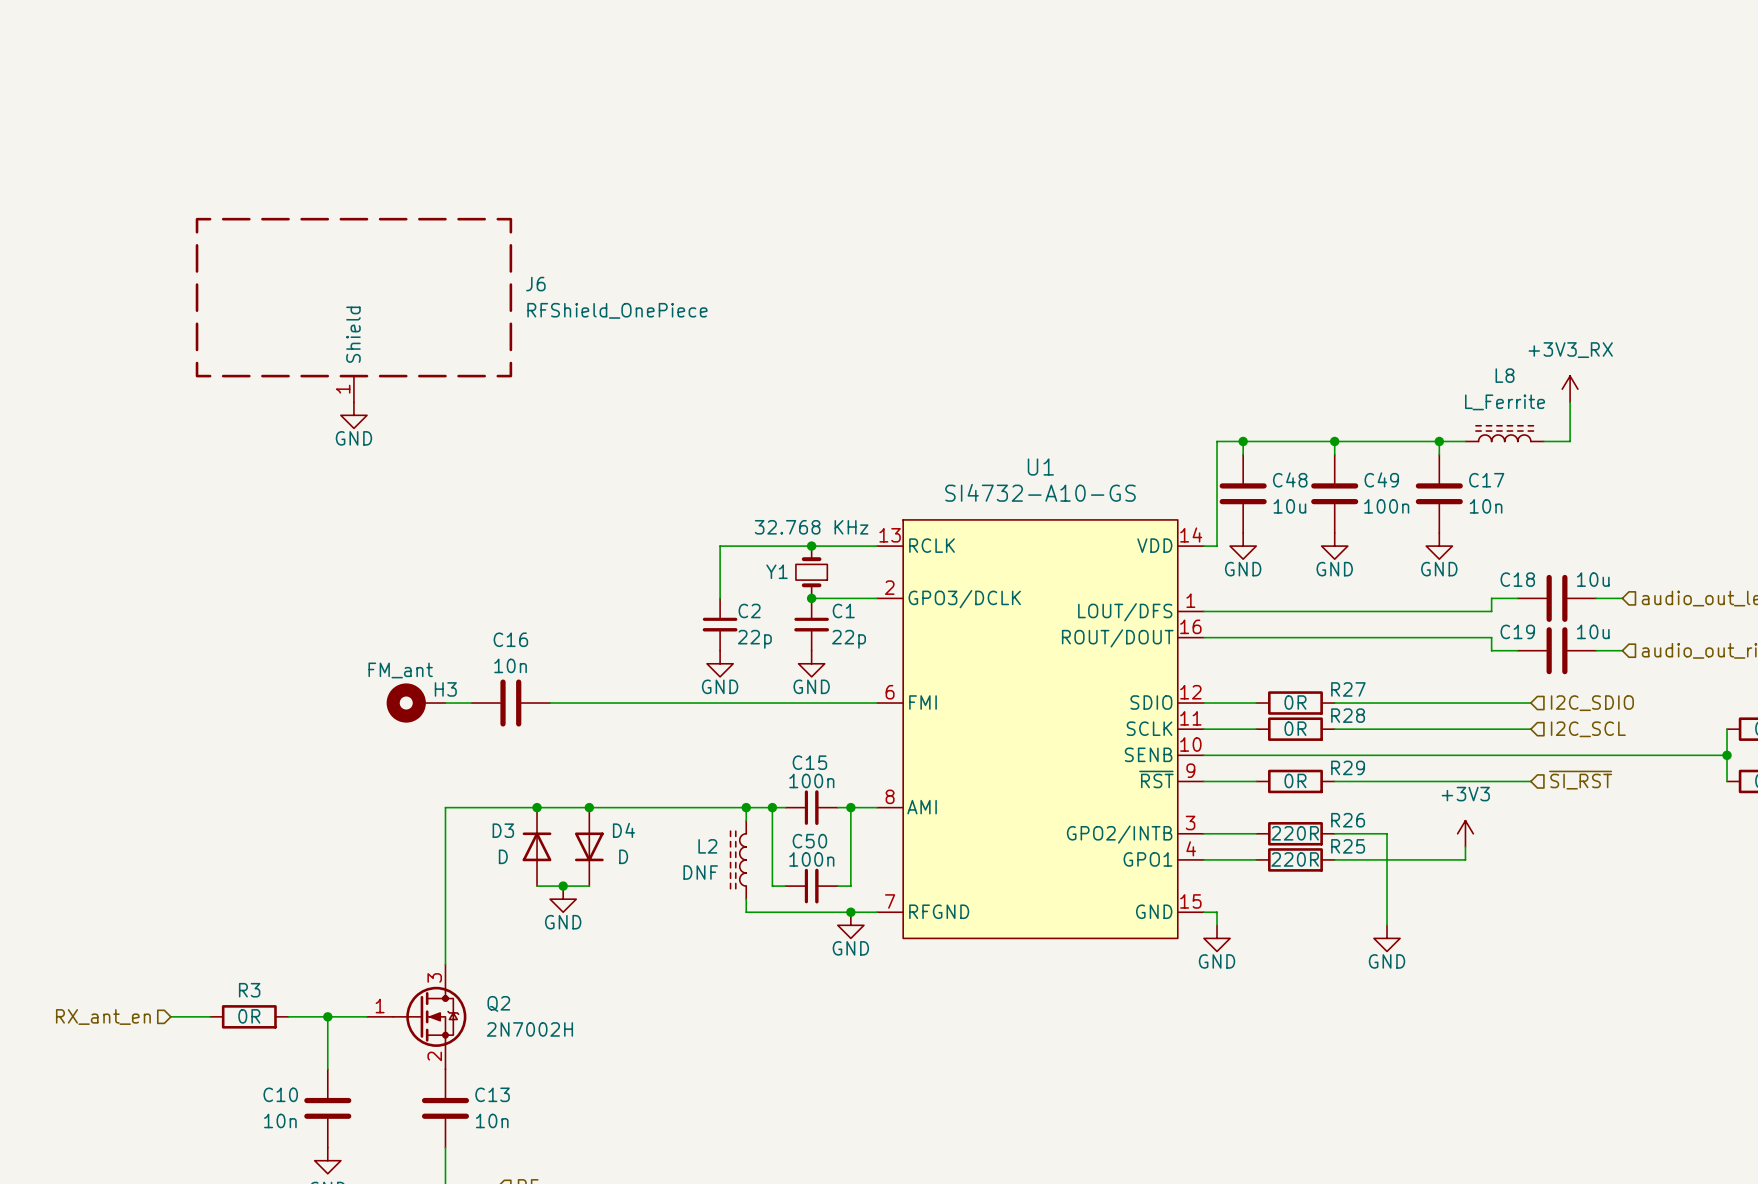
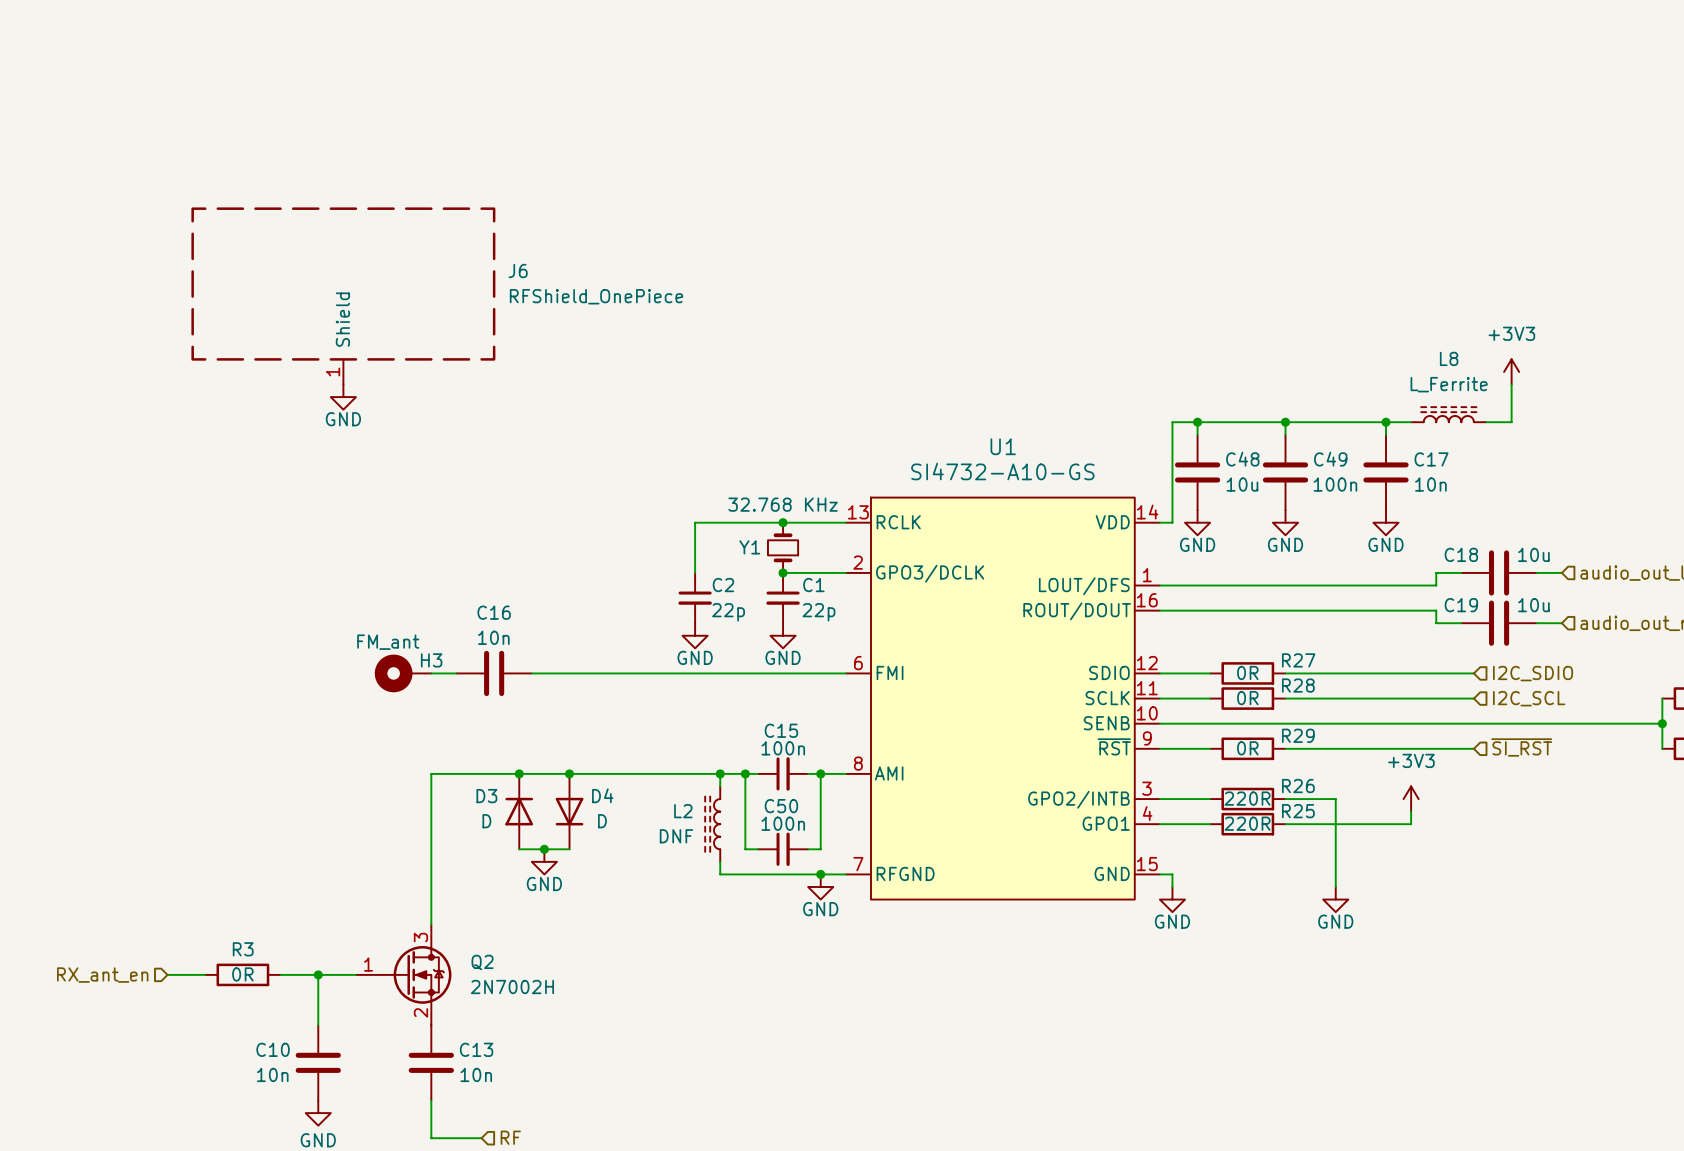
power symbol: +3V3_RX (1570, 389) -> +3V3 (1511, 371)

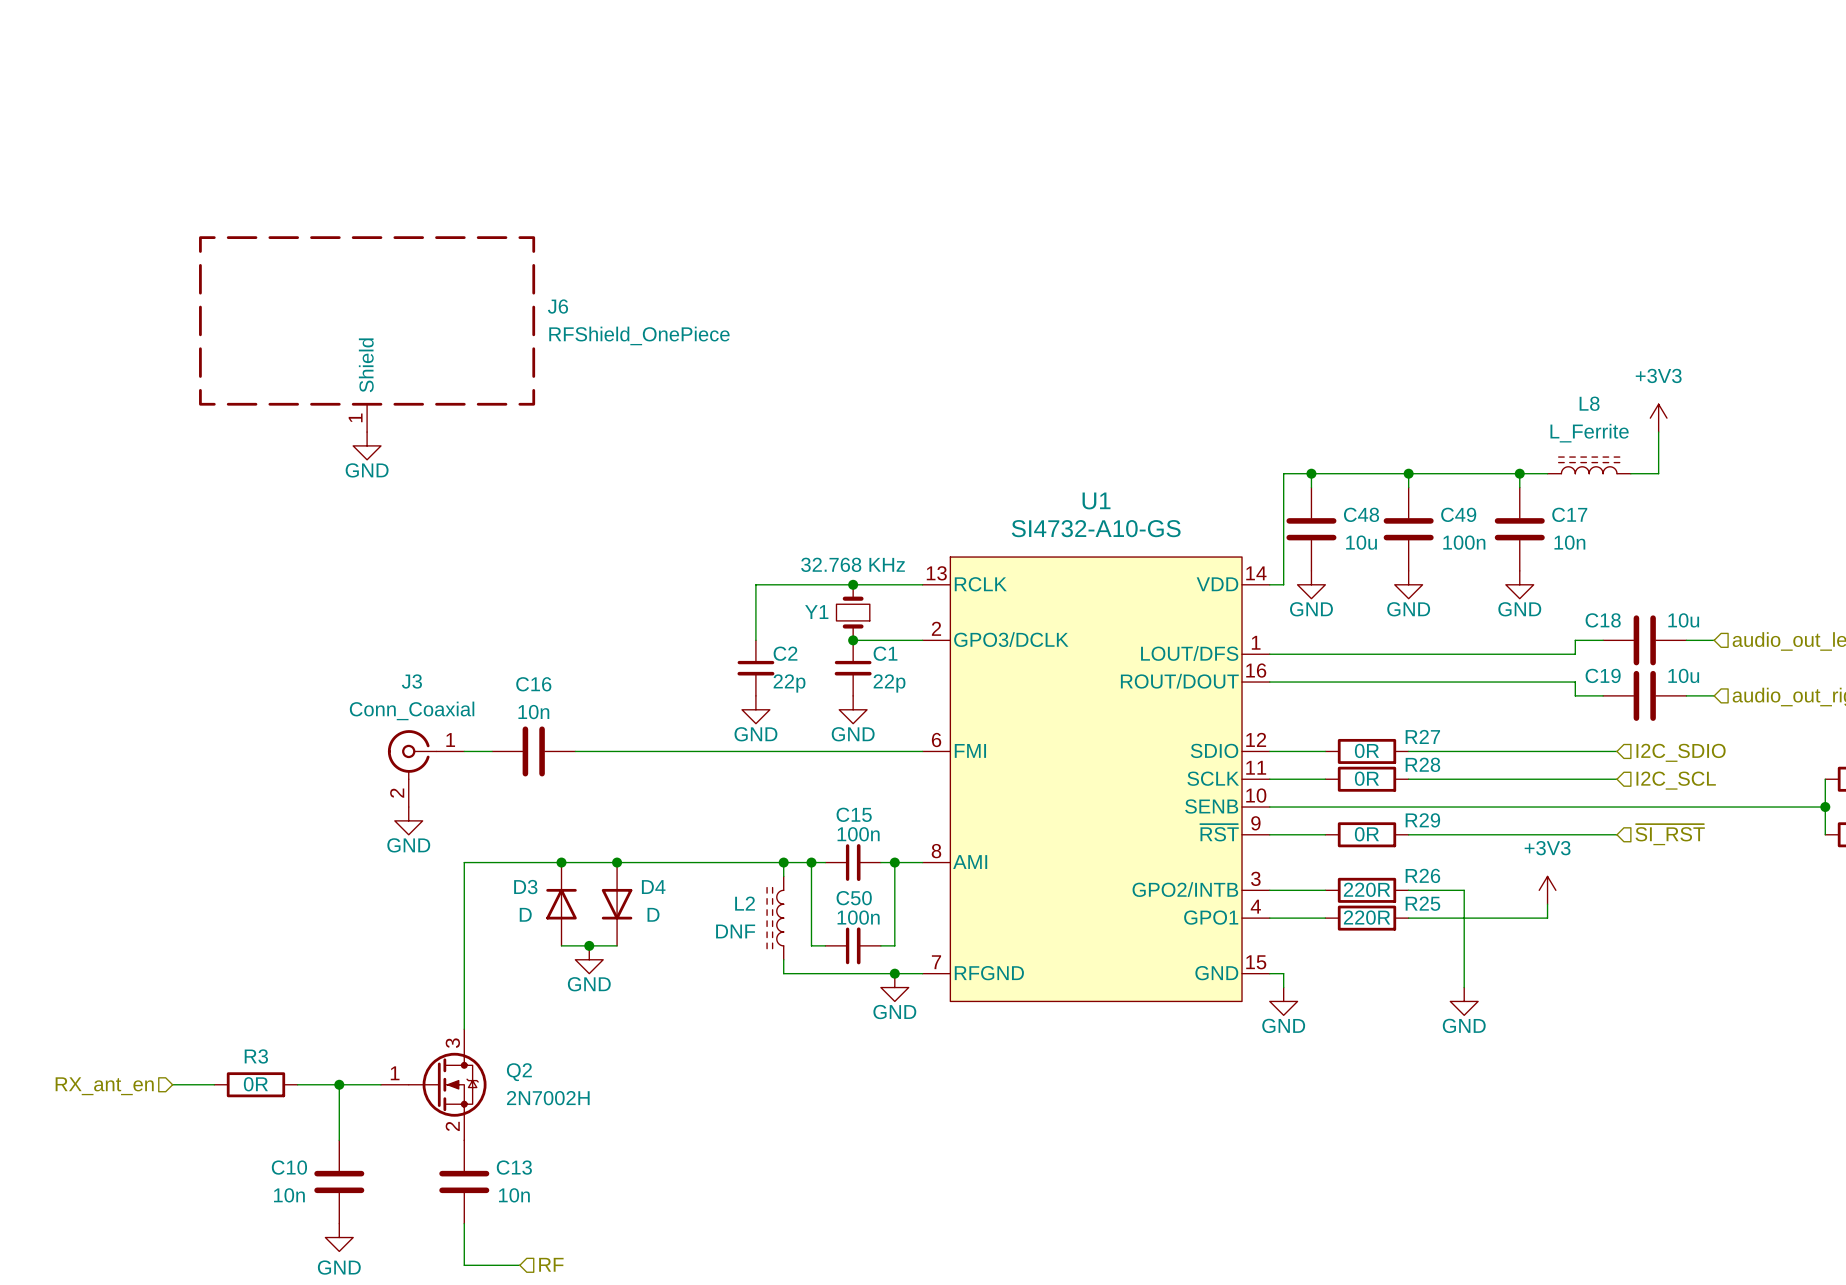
H3: FM_ant (403, 673) -> none
J3: none -> Conn_Coaxial (426, 768)
power symbol: none -> GND (408, 820)

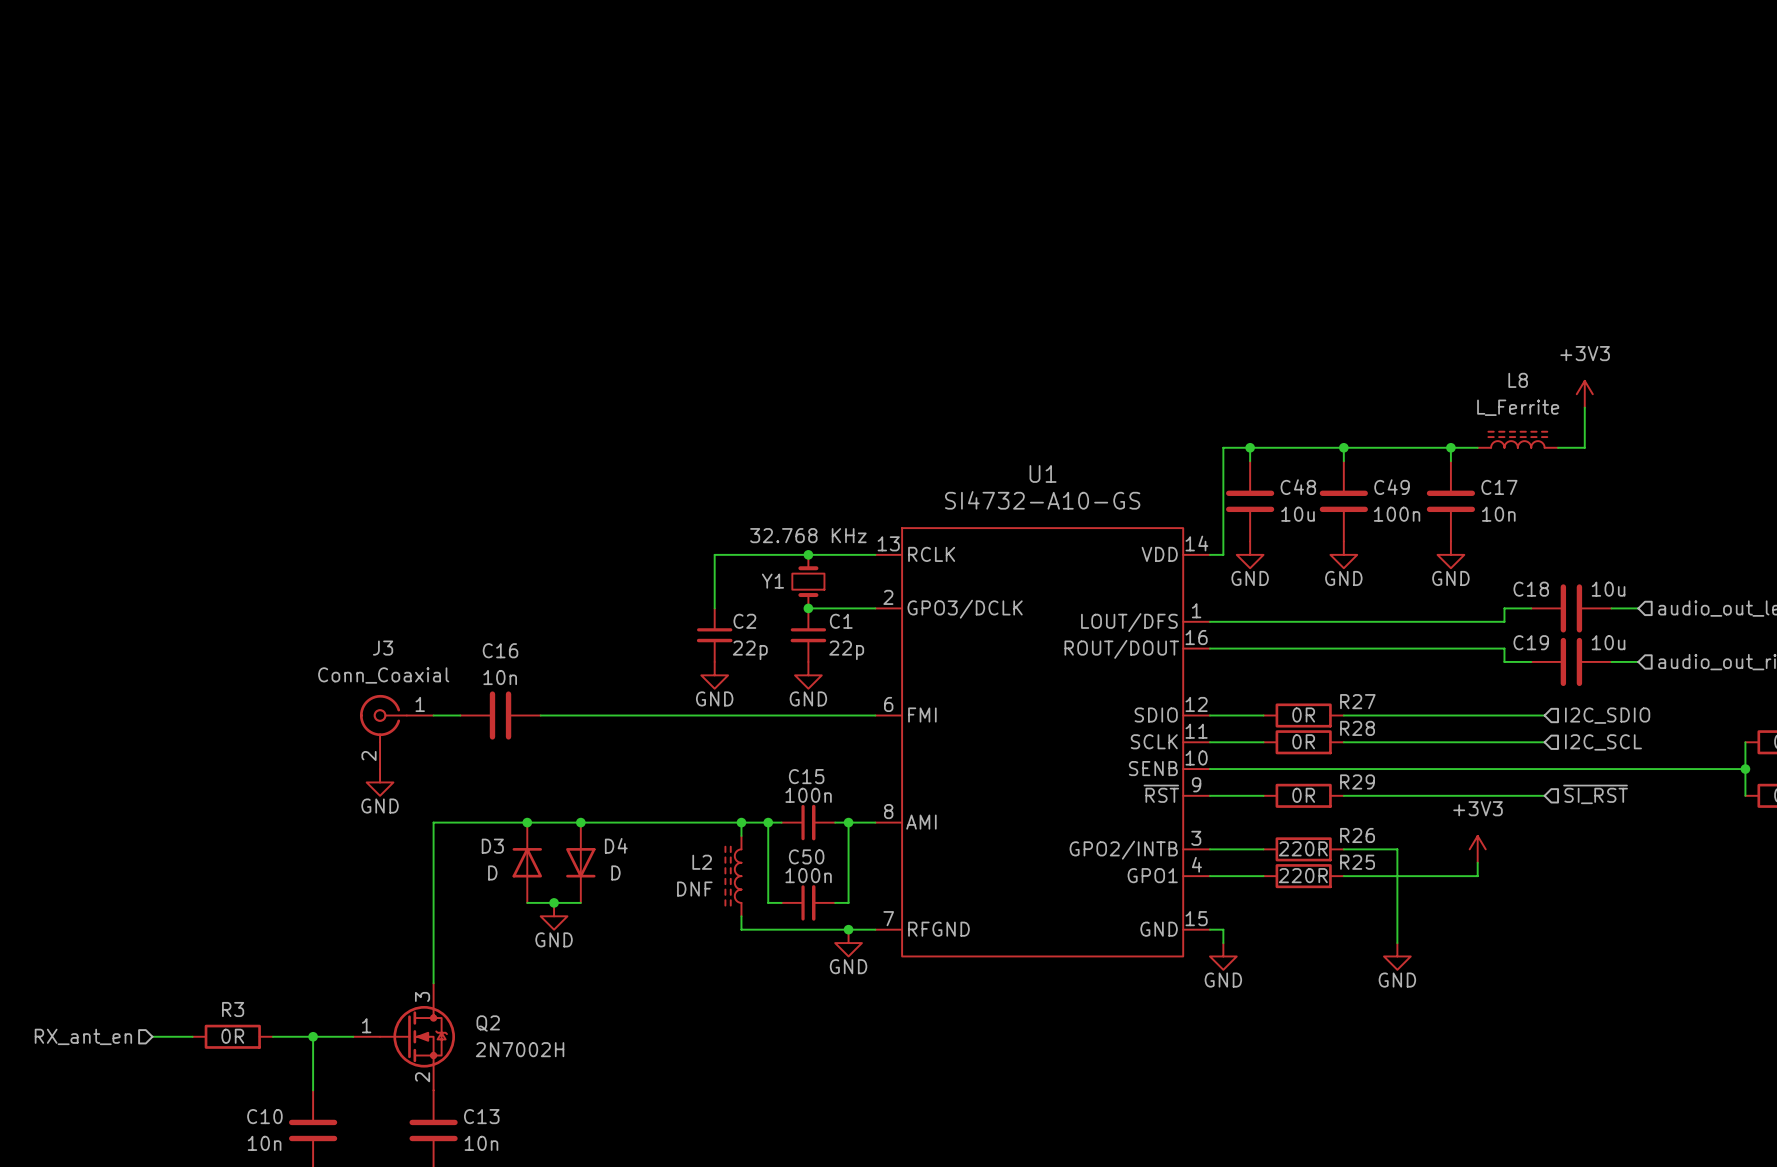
J6: RFShield_OnePiece (367, 334) -> none
power symbol: GND (367, 445) -> none

